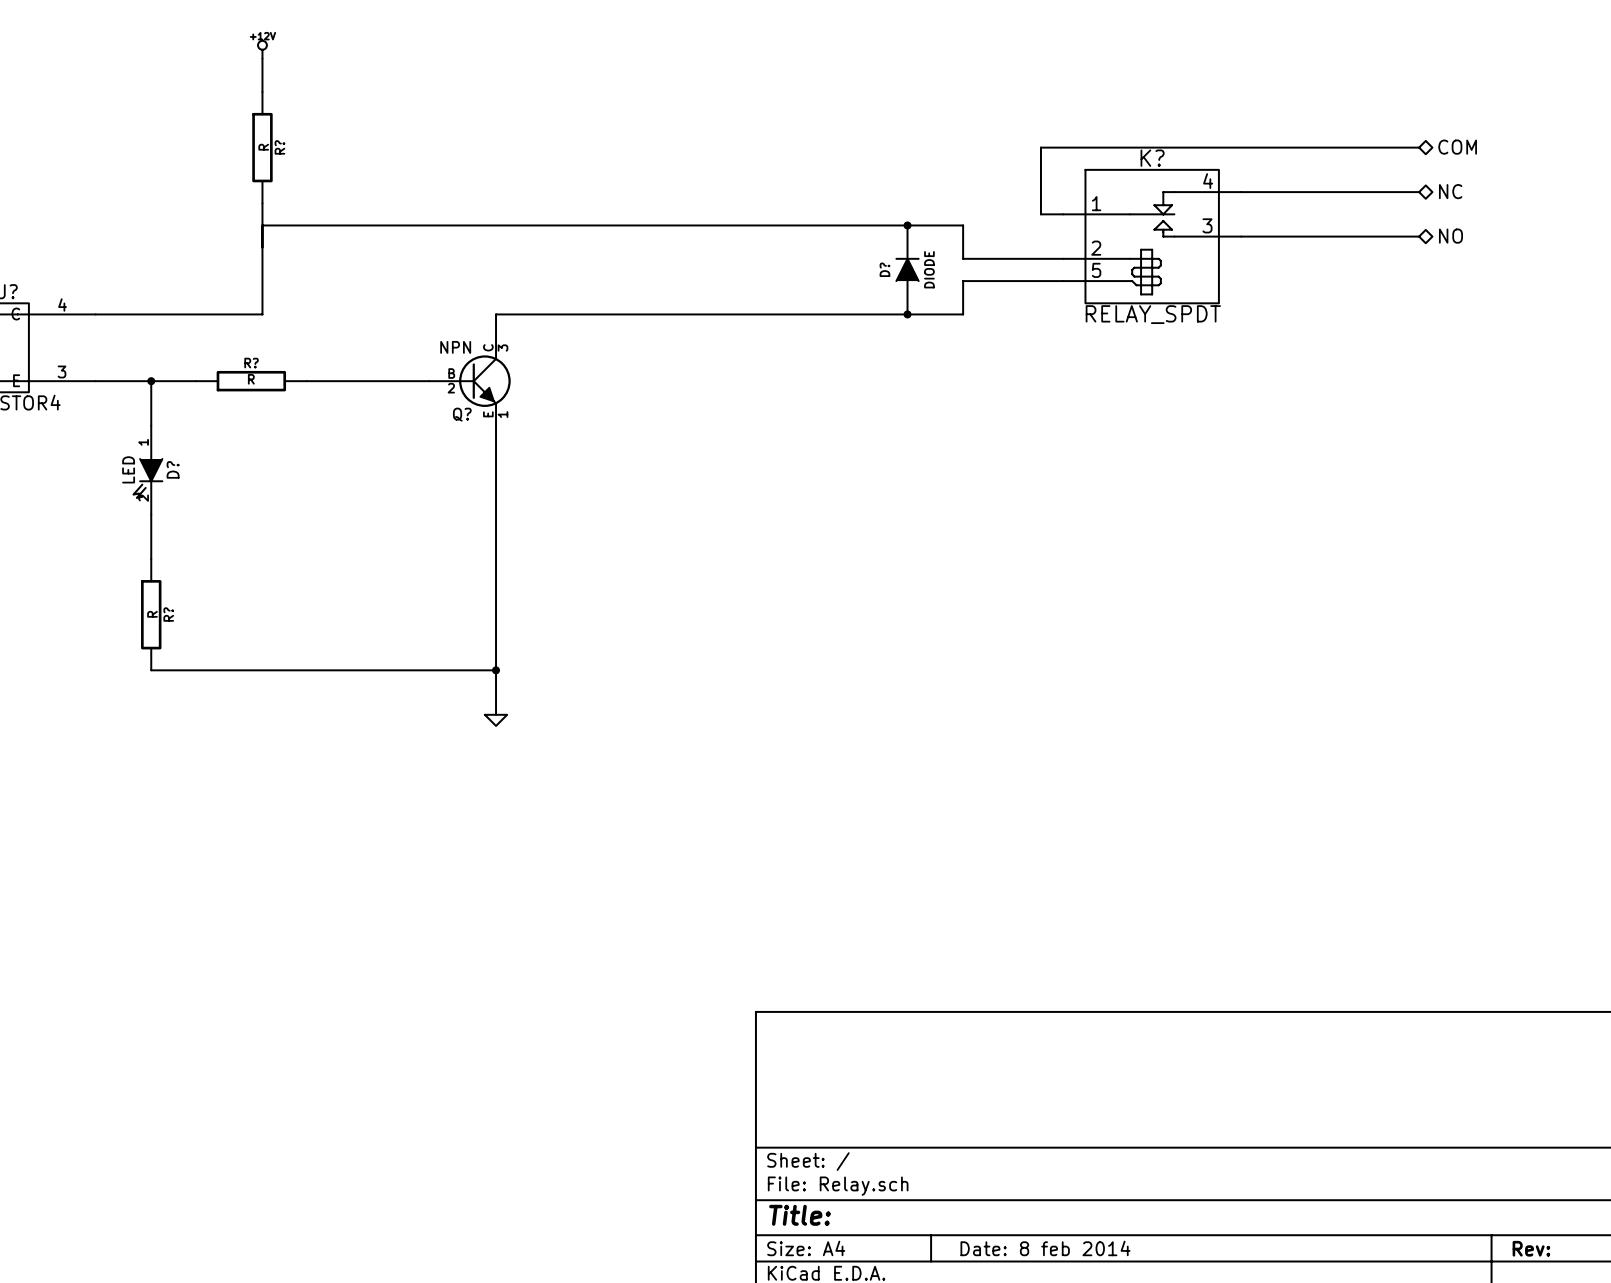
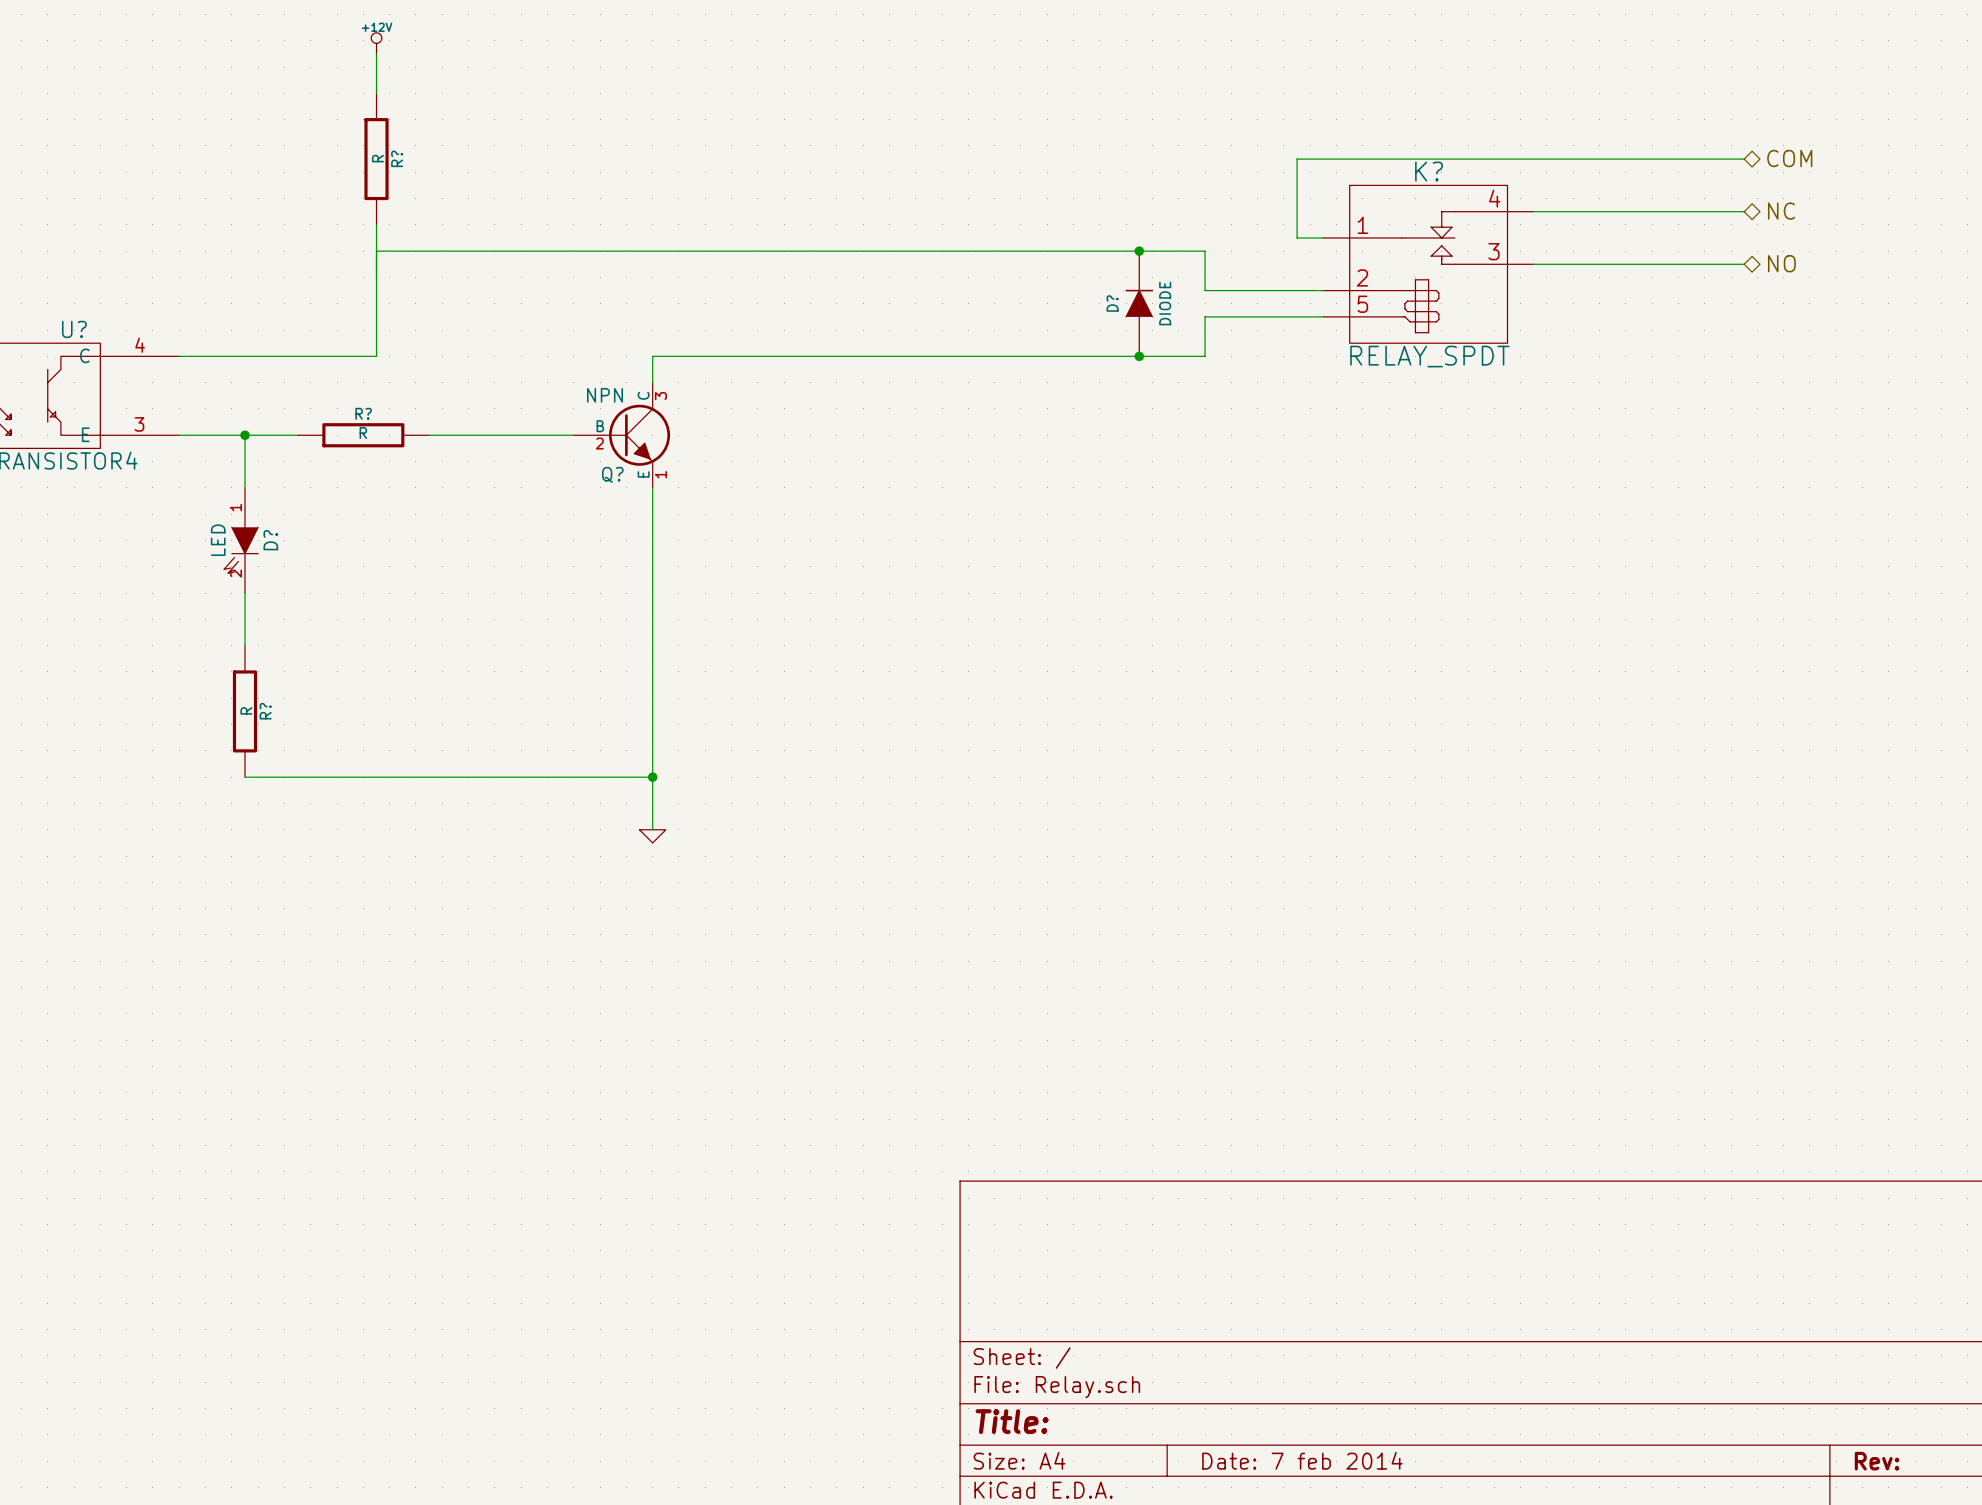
title block: Date: 8 feb 2014 (1045, 1248) -> Date: 7 feb 2014 (1302, 1460)

